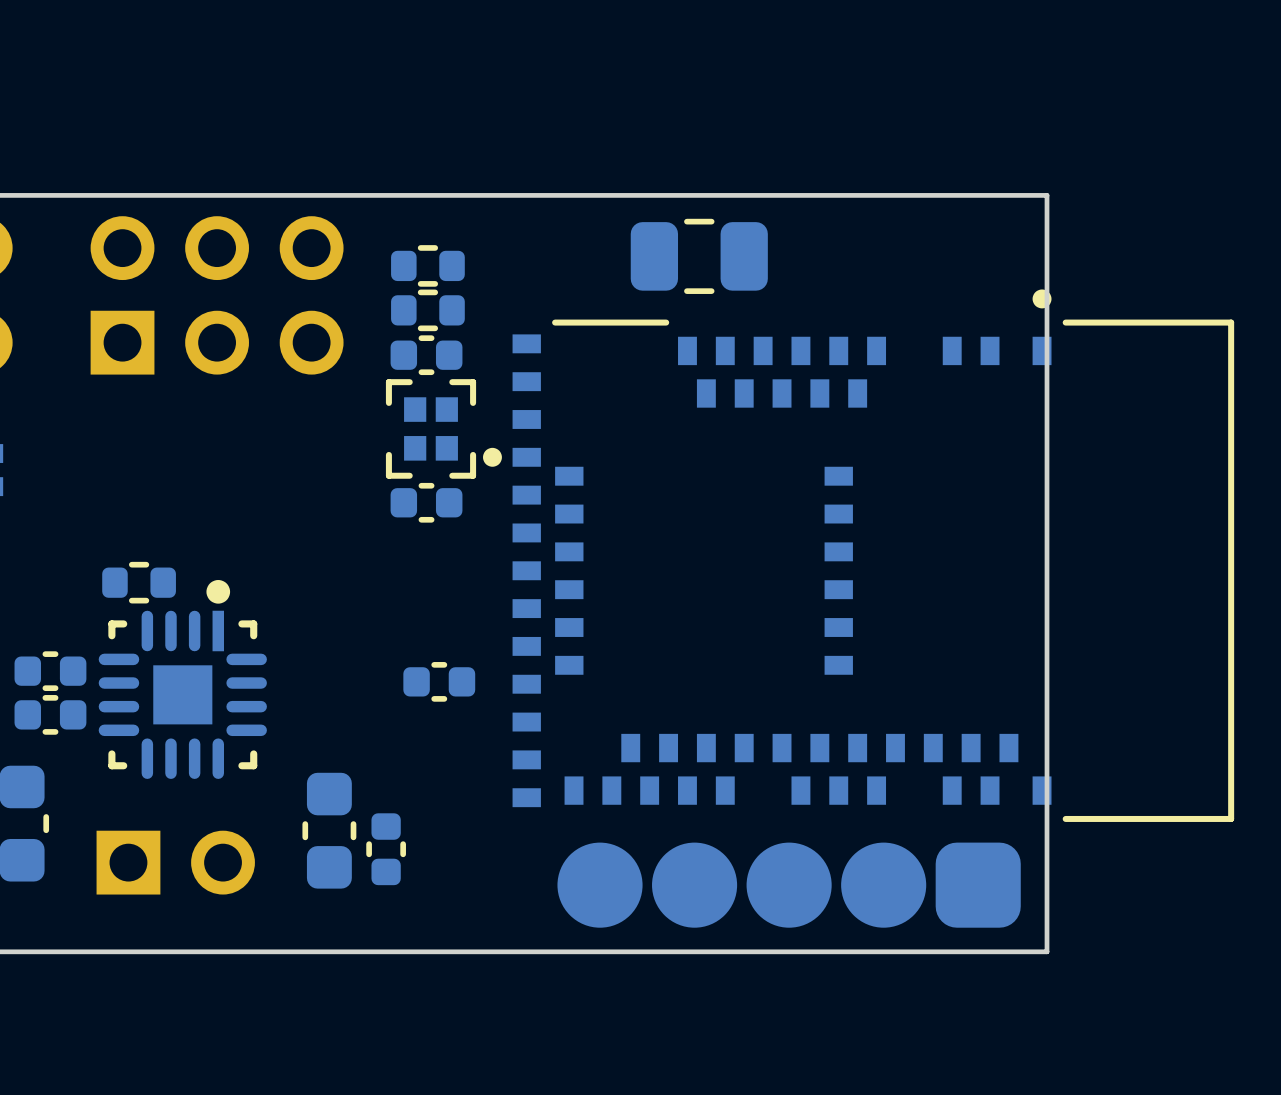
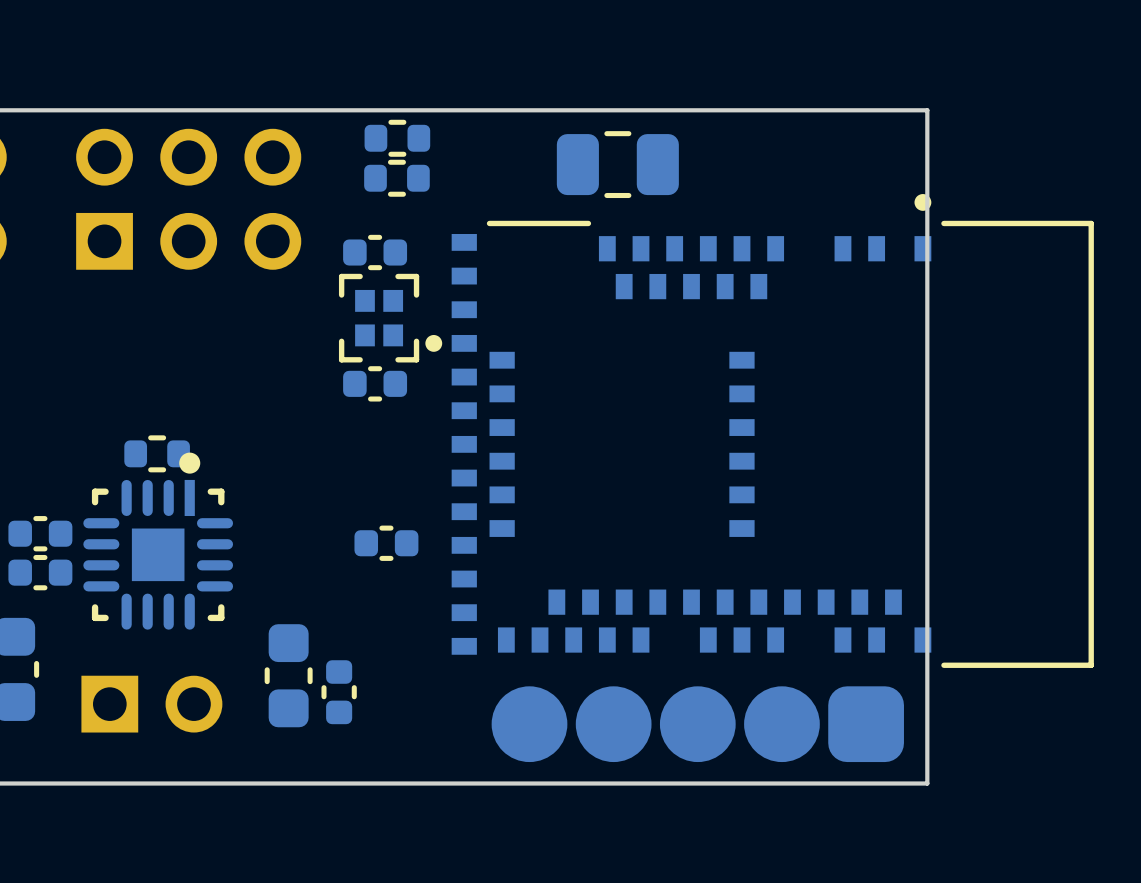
part: none -> (397, 138)
part: (427, 265) -> none
part: none -> (396, 178)
part: (427, 310) -> none
part position: (139, 582) -> (157, 453)

